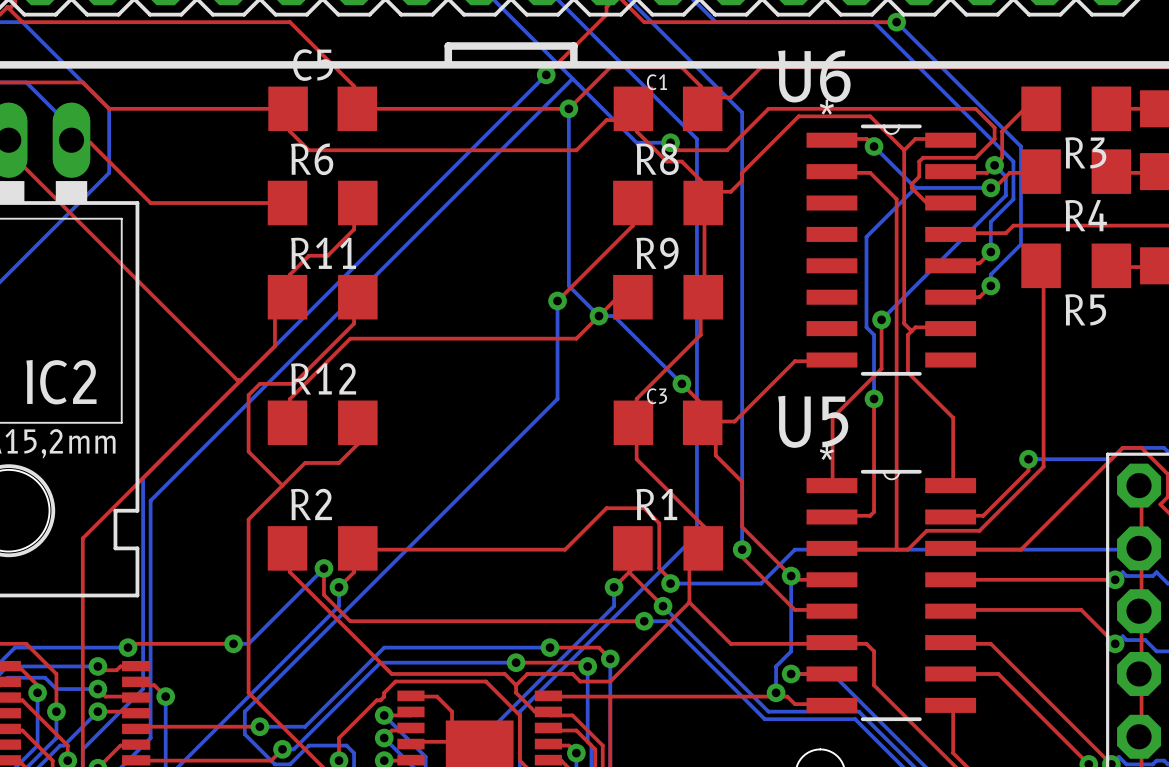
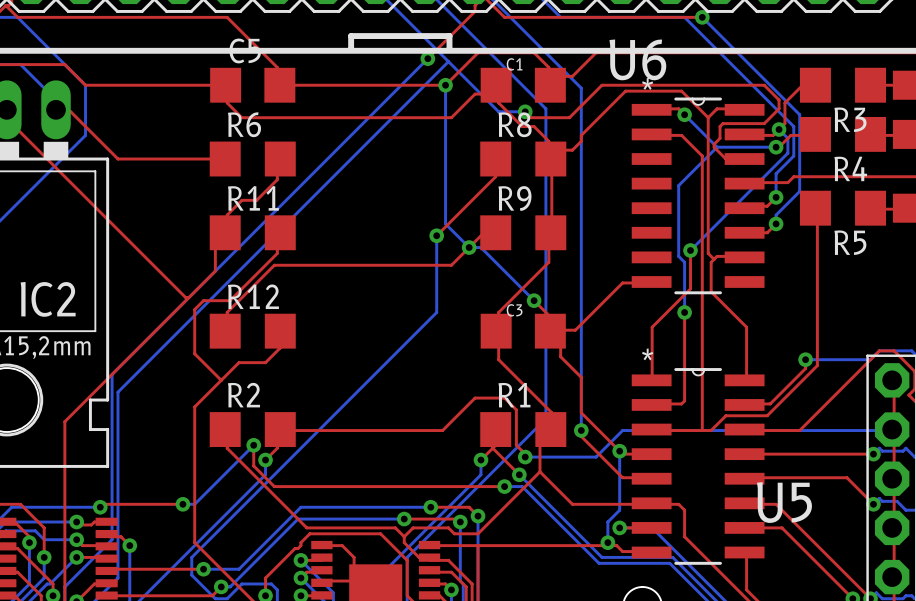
U5 name position: U5 (813, 421) -> U5 (784, 502)

